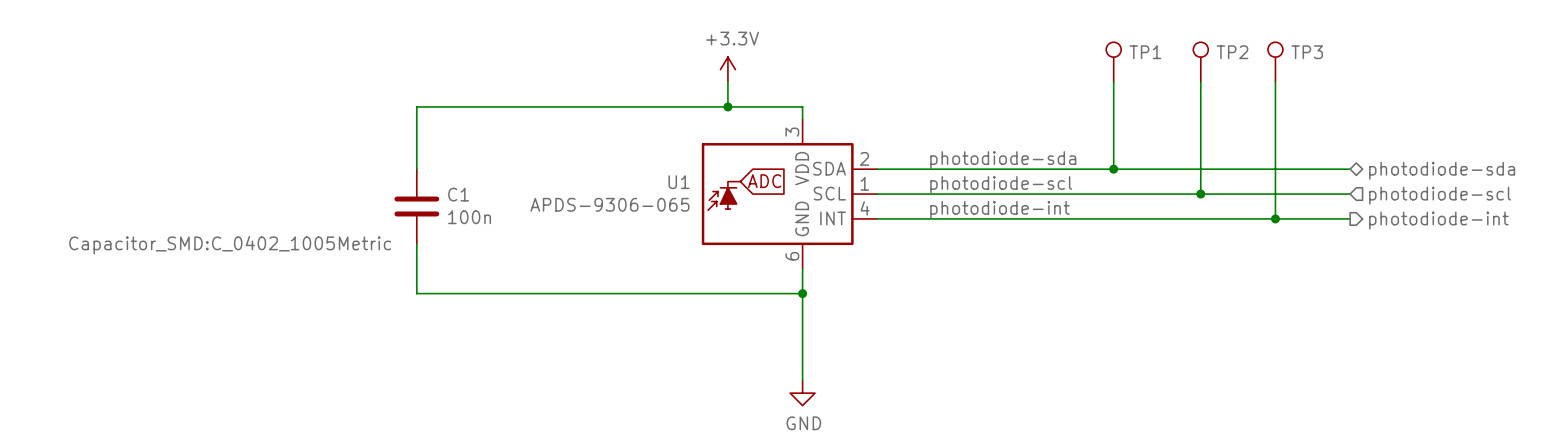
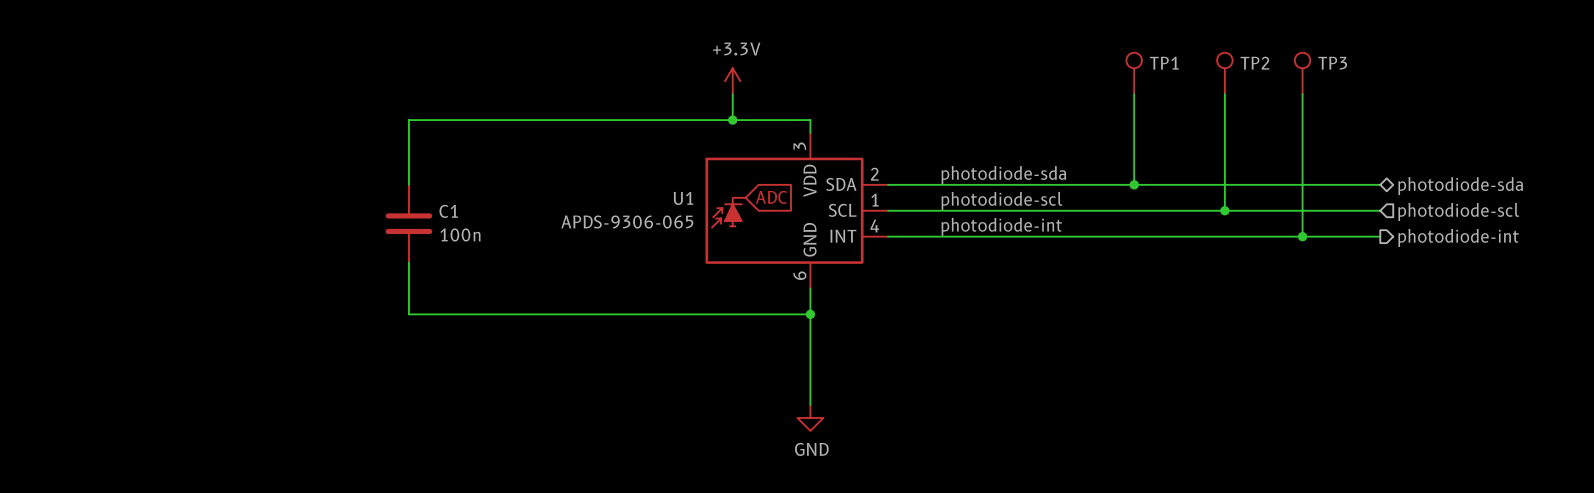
C1 text: Capacitor_SMD:C_0402_1005Metric (230, 245) -> none

